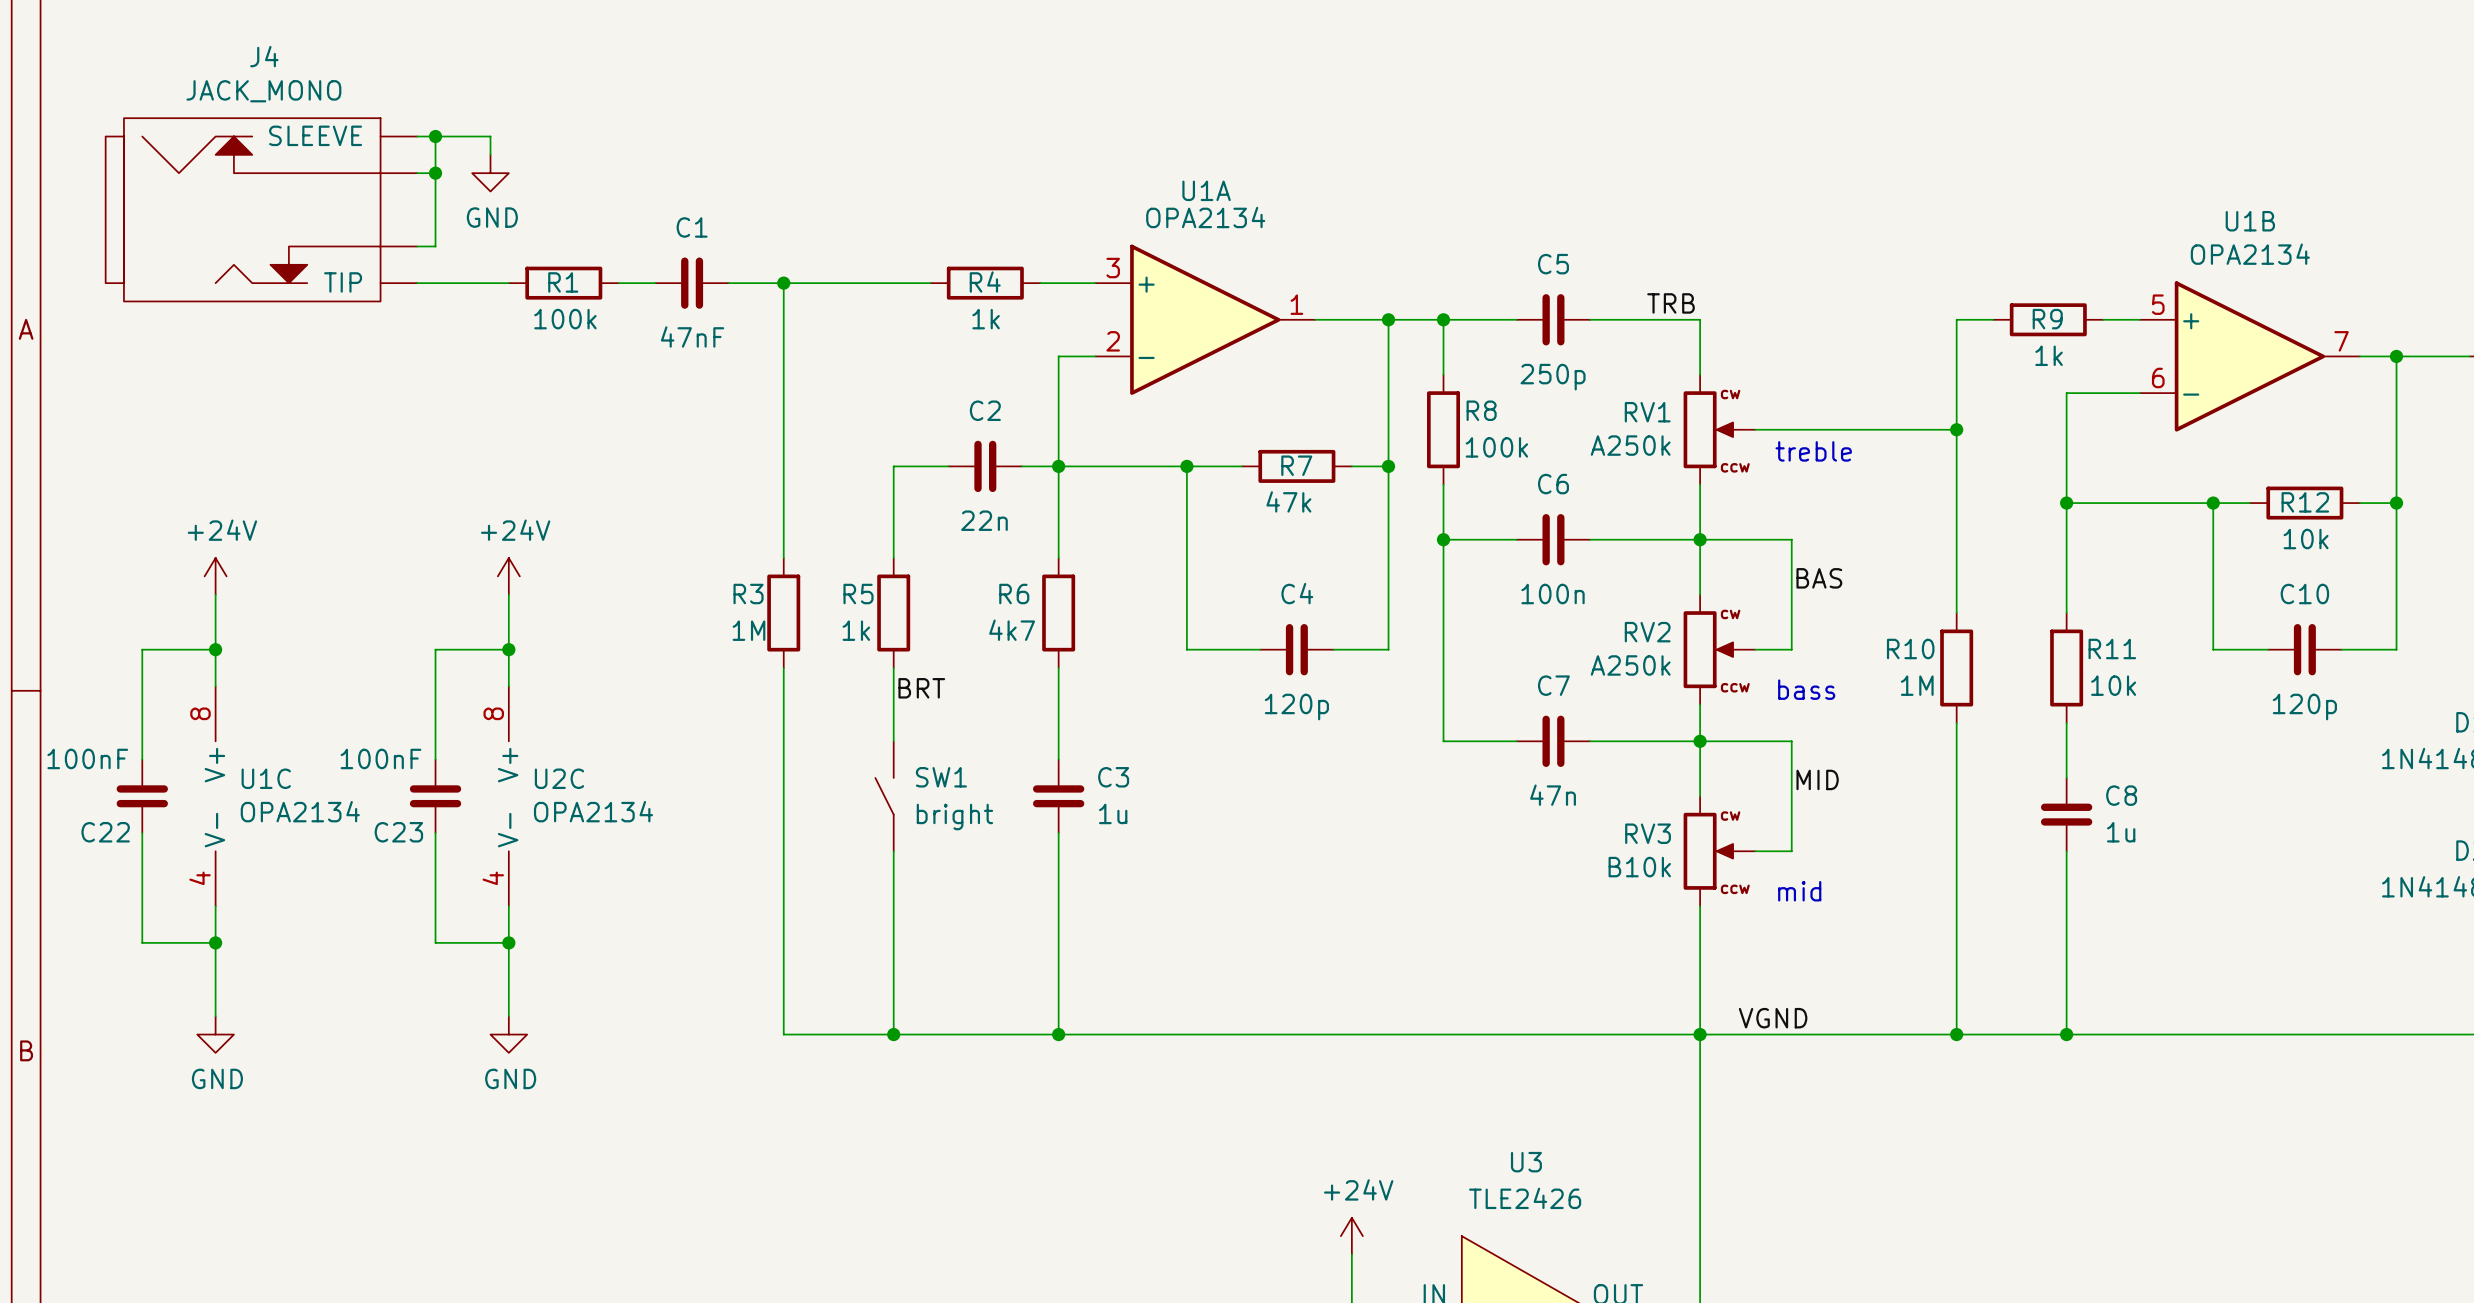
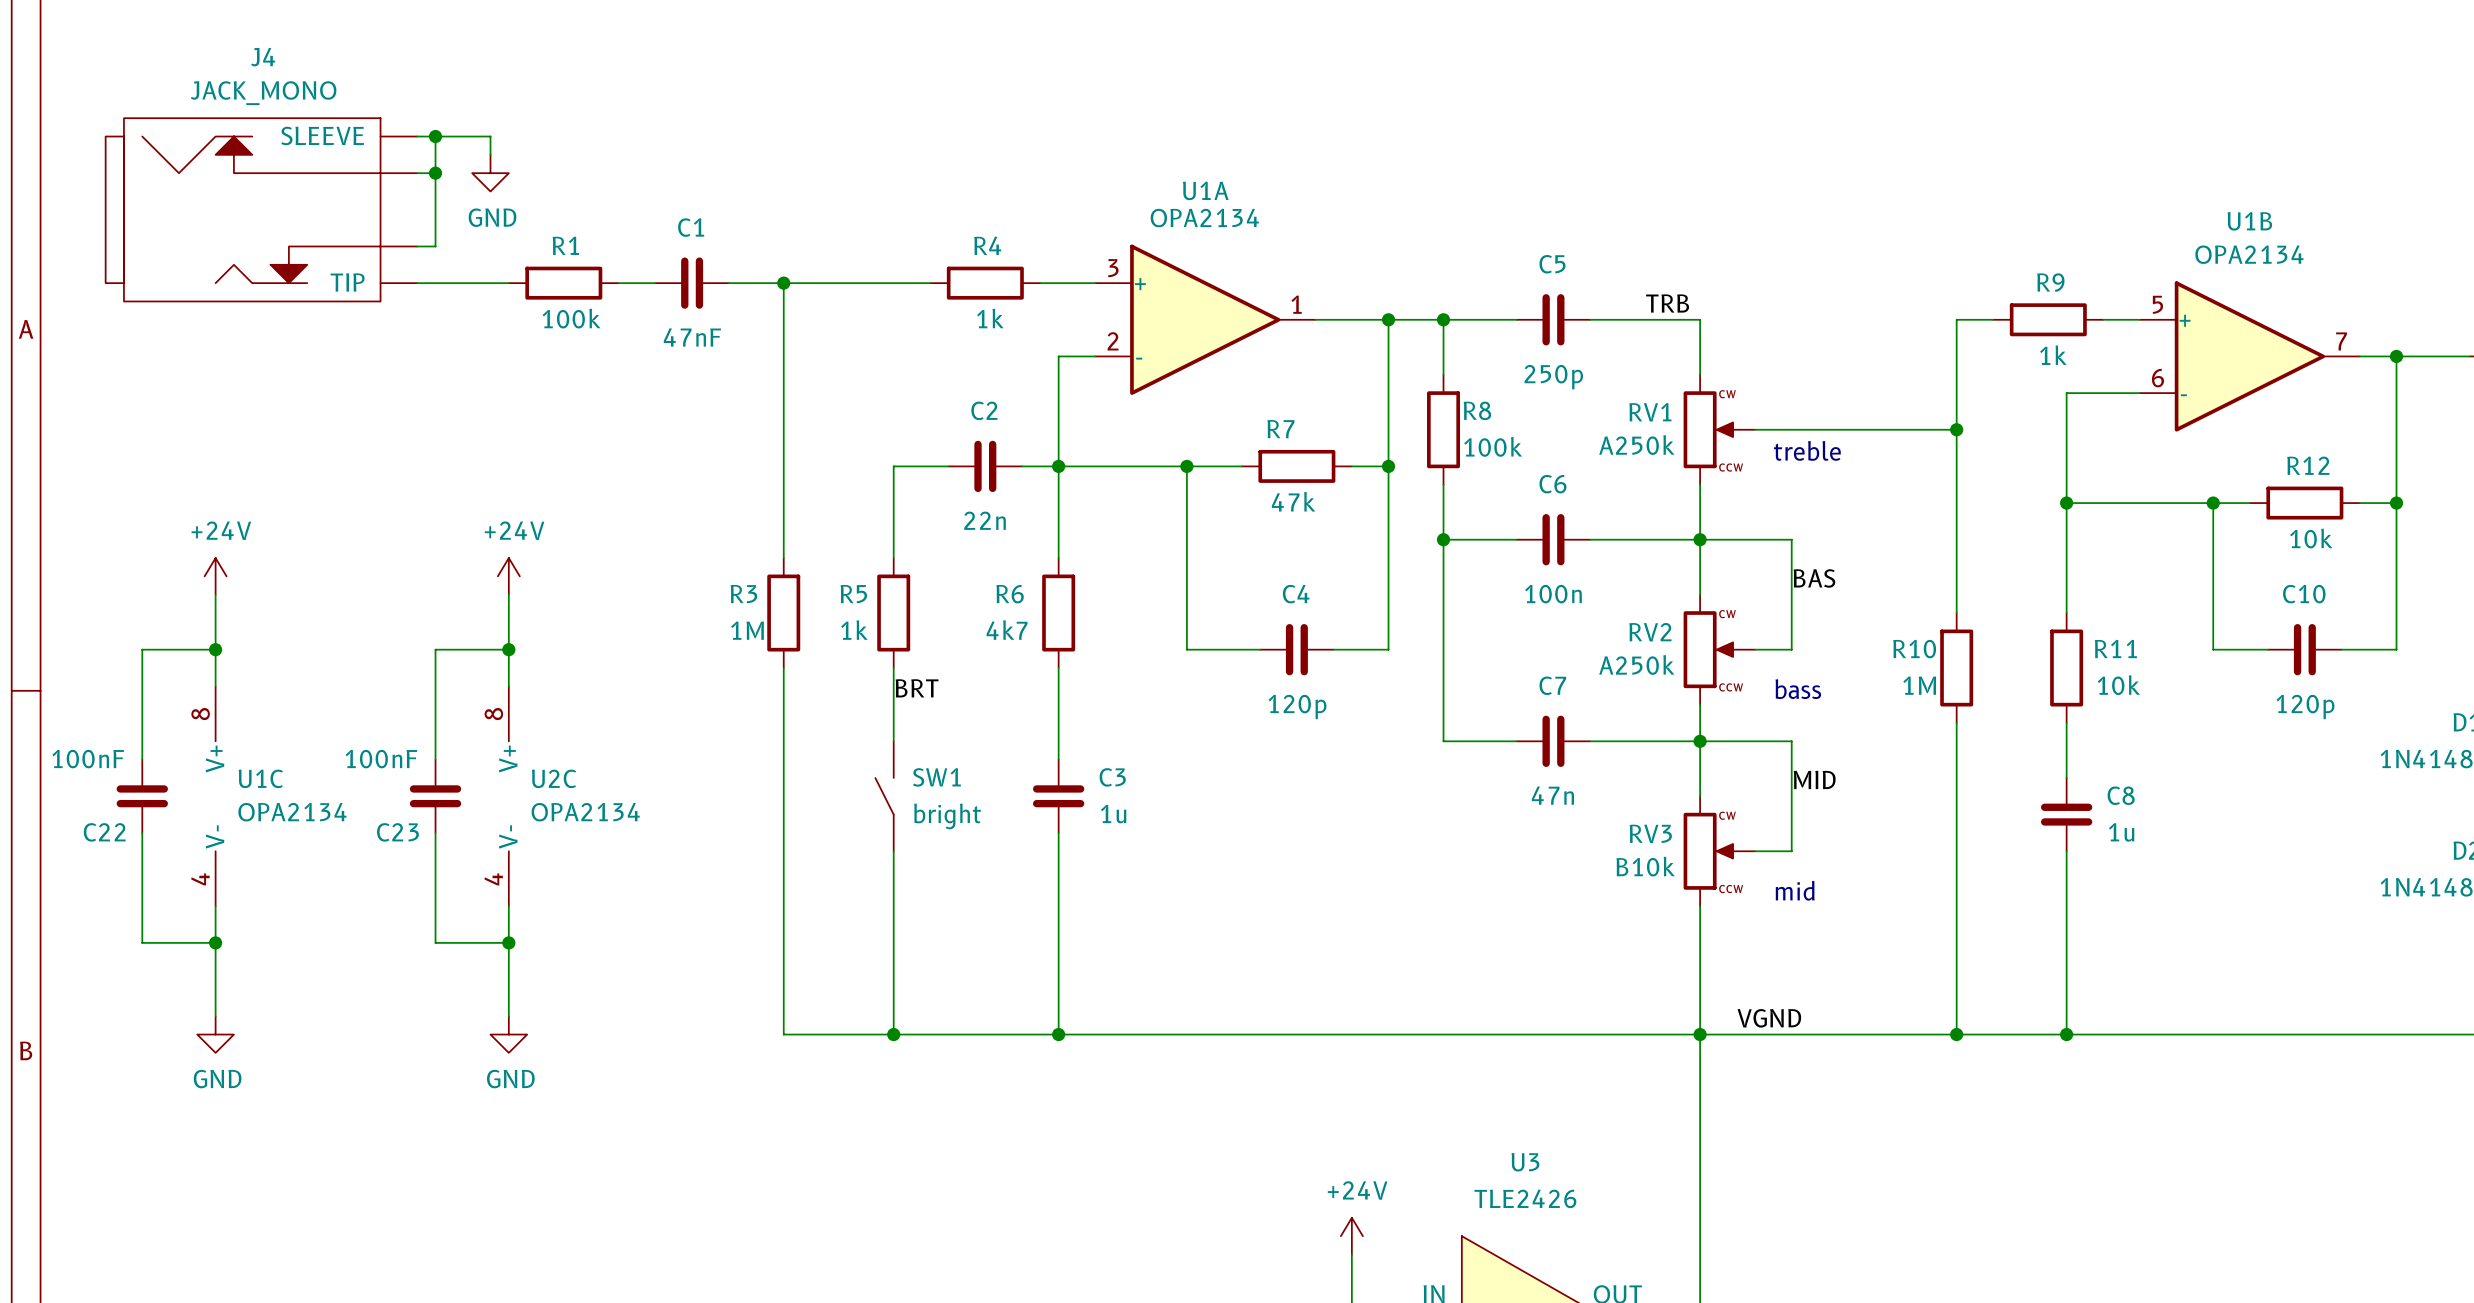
R1 name position: R1 (563, 282) -> R1 (565, 245)
R4 name position: R4 (985, 282) -> R4 (987, 245)
R9 name position: R9 (2047, 319) -> R9 (2050, 282)
R7 name position: R7 (1296, 465) -> R7 (1280, 429)
R12 name position: R12 (2305, 502) -> R12 (2308, 465)

